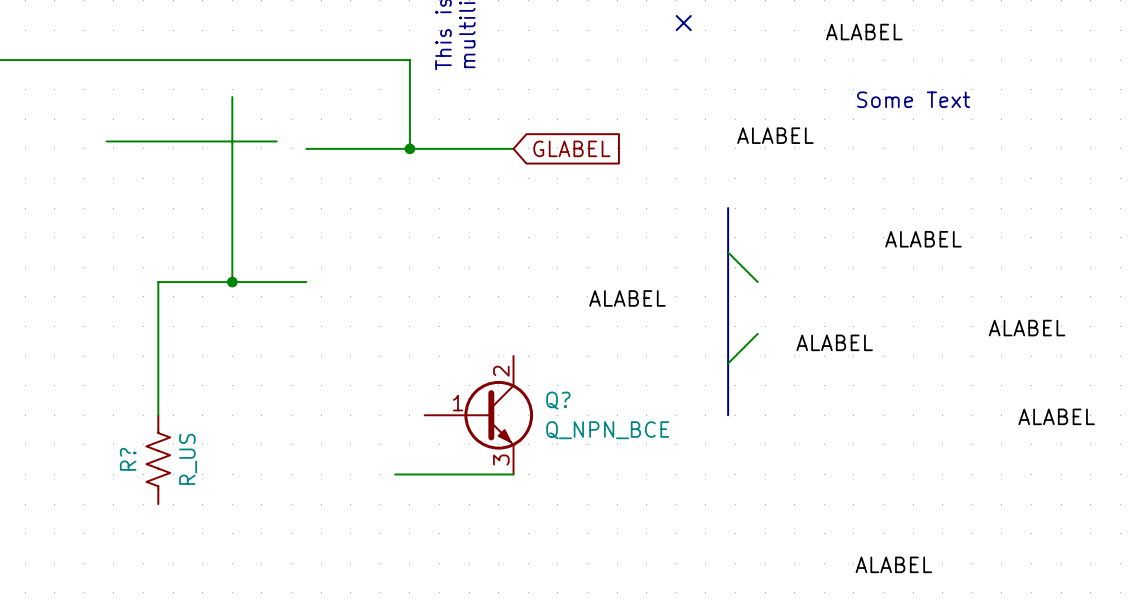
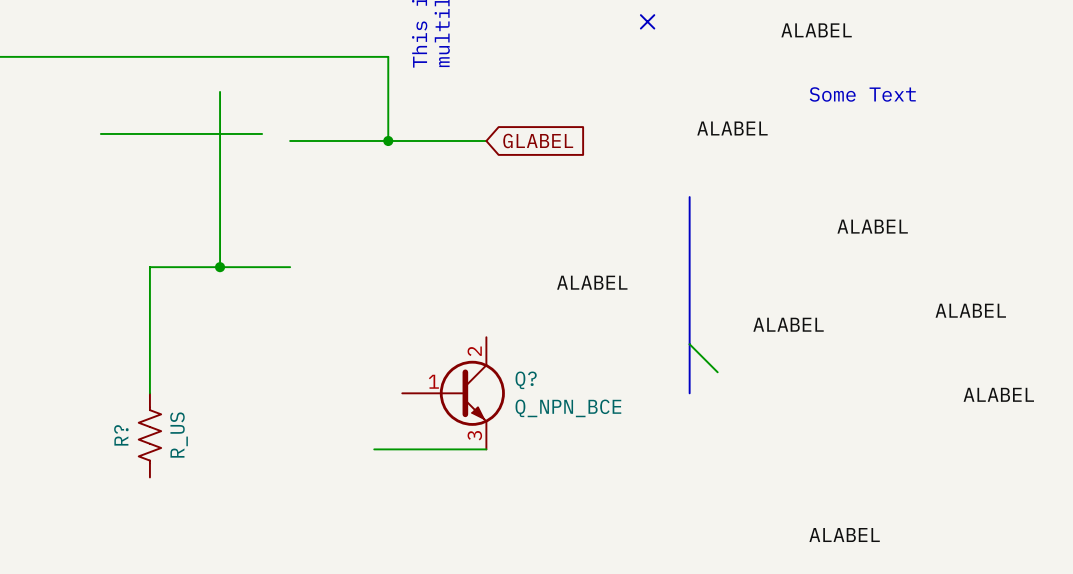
wire: (728, 252) (757, 282) -> none
wire: (757, 333) (728, 363) -> (717, 372) (689, 344)

